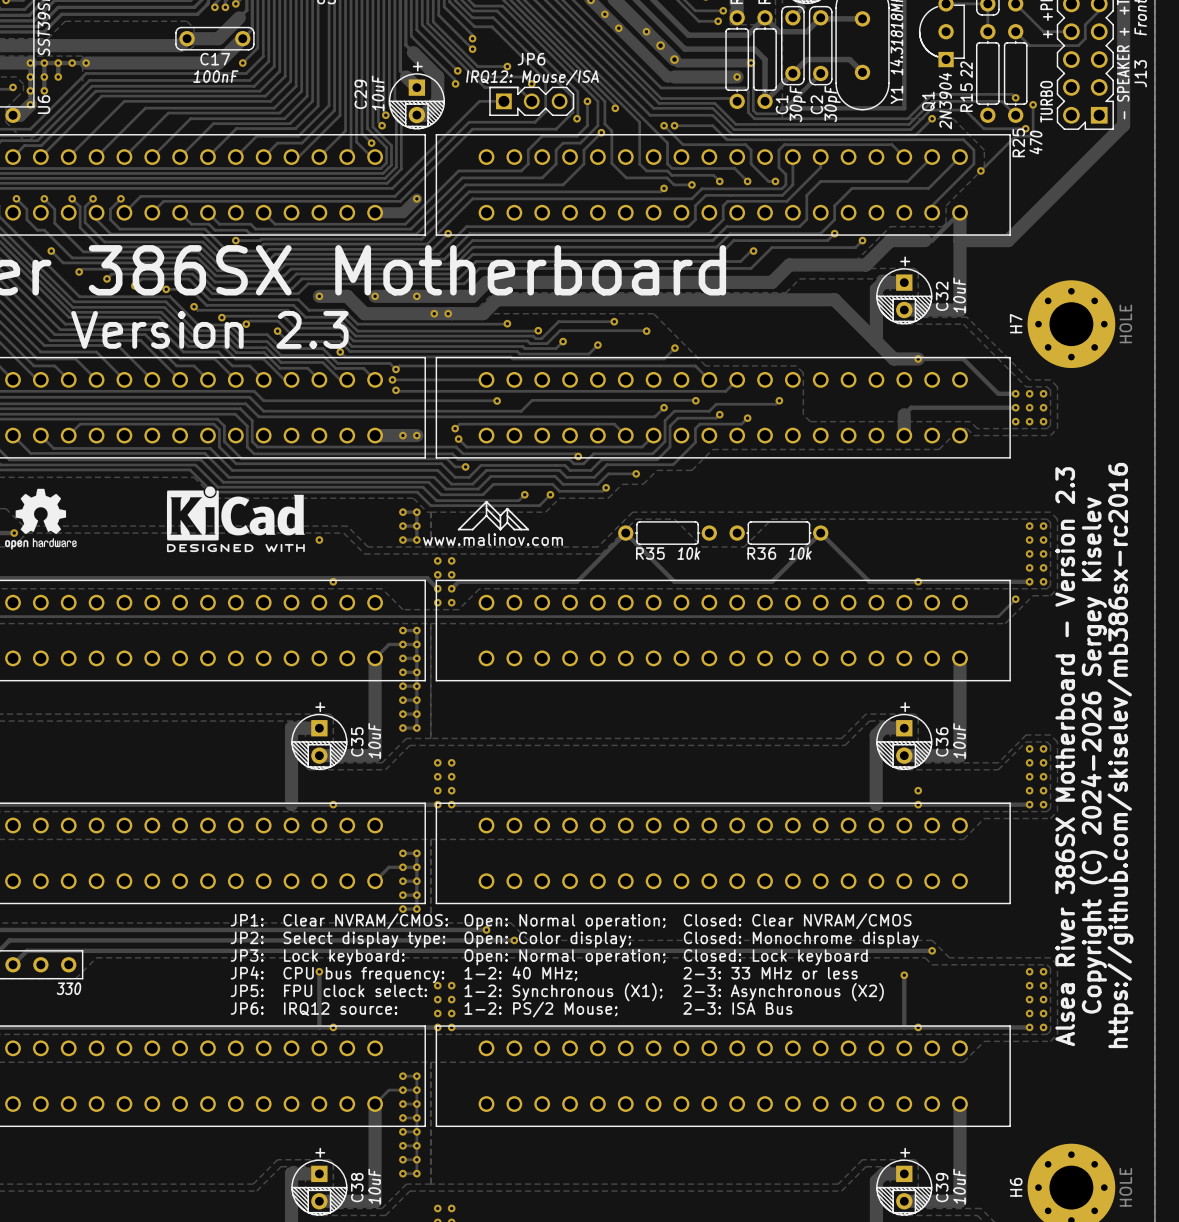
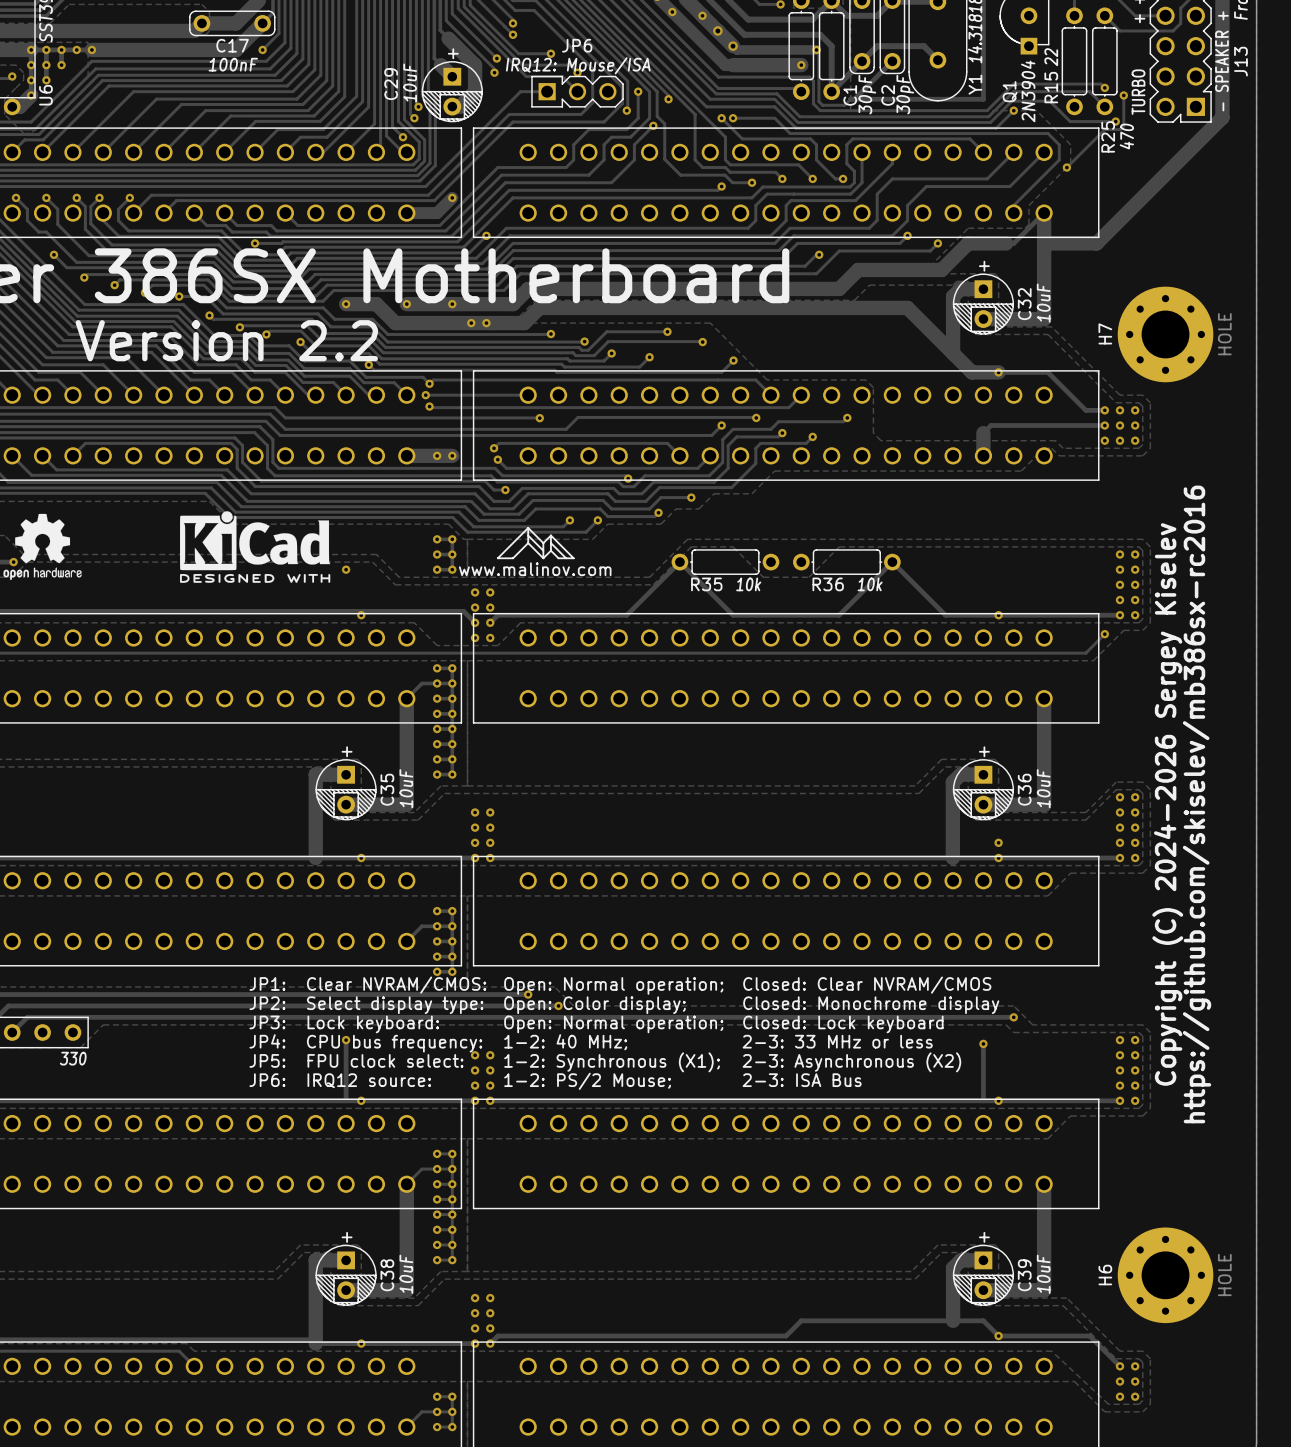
text: Version 2.3 (209, 329) -> Version 2.2 (226, 340)
text: Copyright (C) 2024-2026 Sergey Kiselev (1093, 755) -> https://github.com/skiselev/mb386sx-rc2016 (1197, 804)
text: https://github.com/skiselev/mb386sx-rc2016 (1120, 755) -> none
text: Alsea River 386SX Motherboard - Version 2.3 (1065, 756) -> Copyright (C) 2024-2026 Sergey Kiselev (1167, 804)

